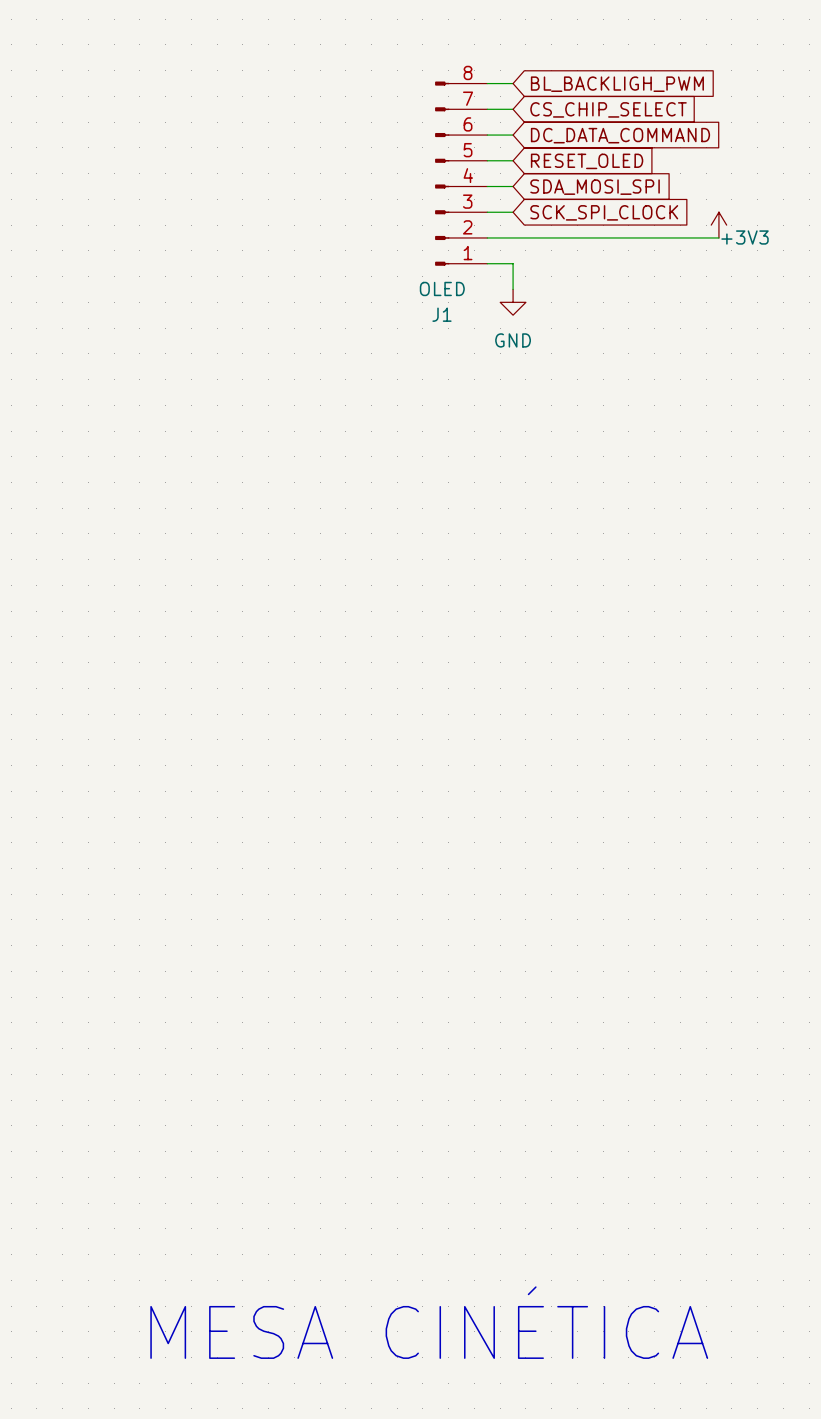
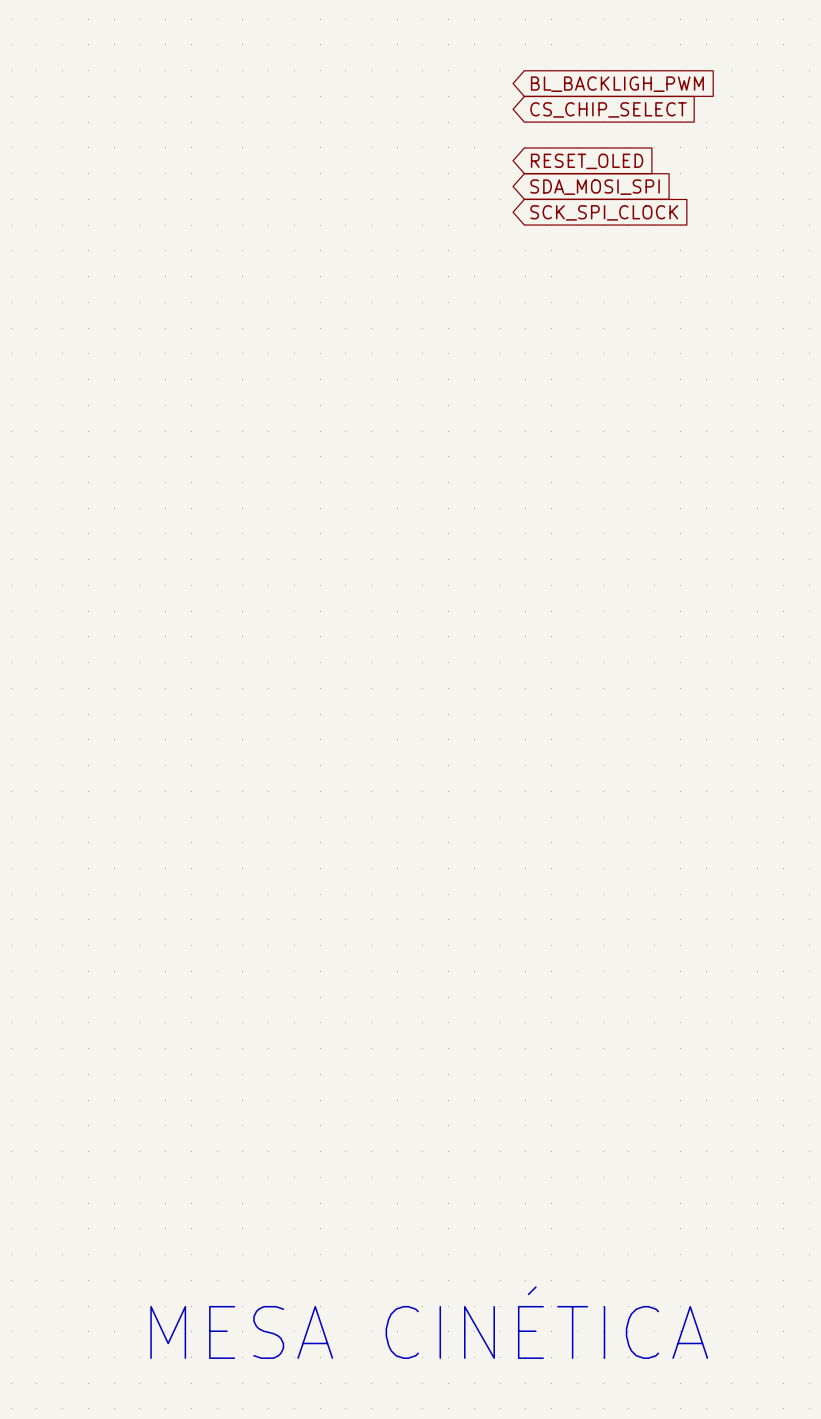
wire: (487, 83) (513, 83) -> none
wire: (487, 109) (513, 109) -> none
wire: (487, 135) (513, 135) -> none
global label: DC_DATA_COMMAND (620, 135) -> none
wire: (487, 160) (513, 160) -> none
J1: OLED (461, 173) -> none
wire: (487, 186) (513, 186) -> none
wire: (487, 212) (513, 212) -> none
power symbol: +3V3 (718, 225) -> none
wire: (487, 237) (718, 237) -> none
wire: (487, 263) (513, 263) (513, 289) -> none
power symbol: GND (513, 302) -> none

